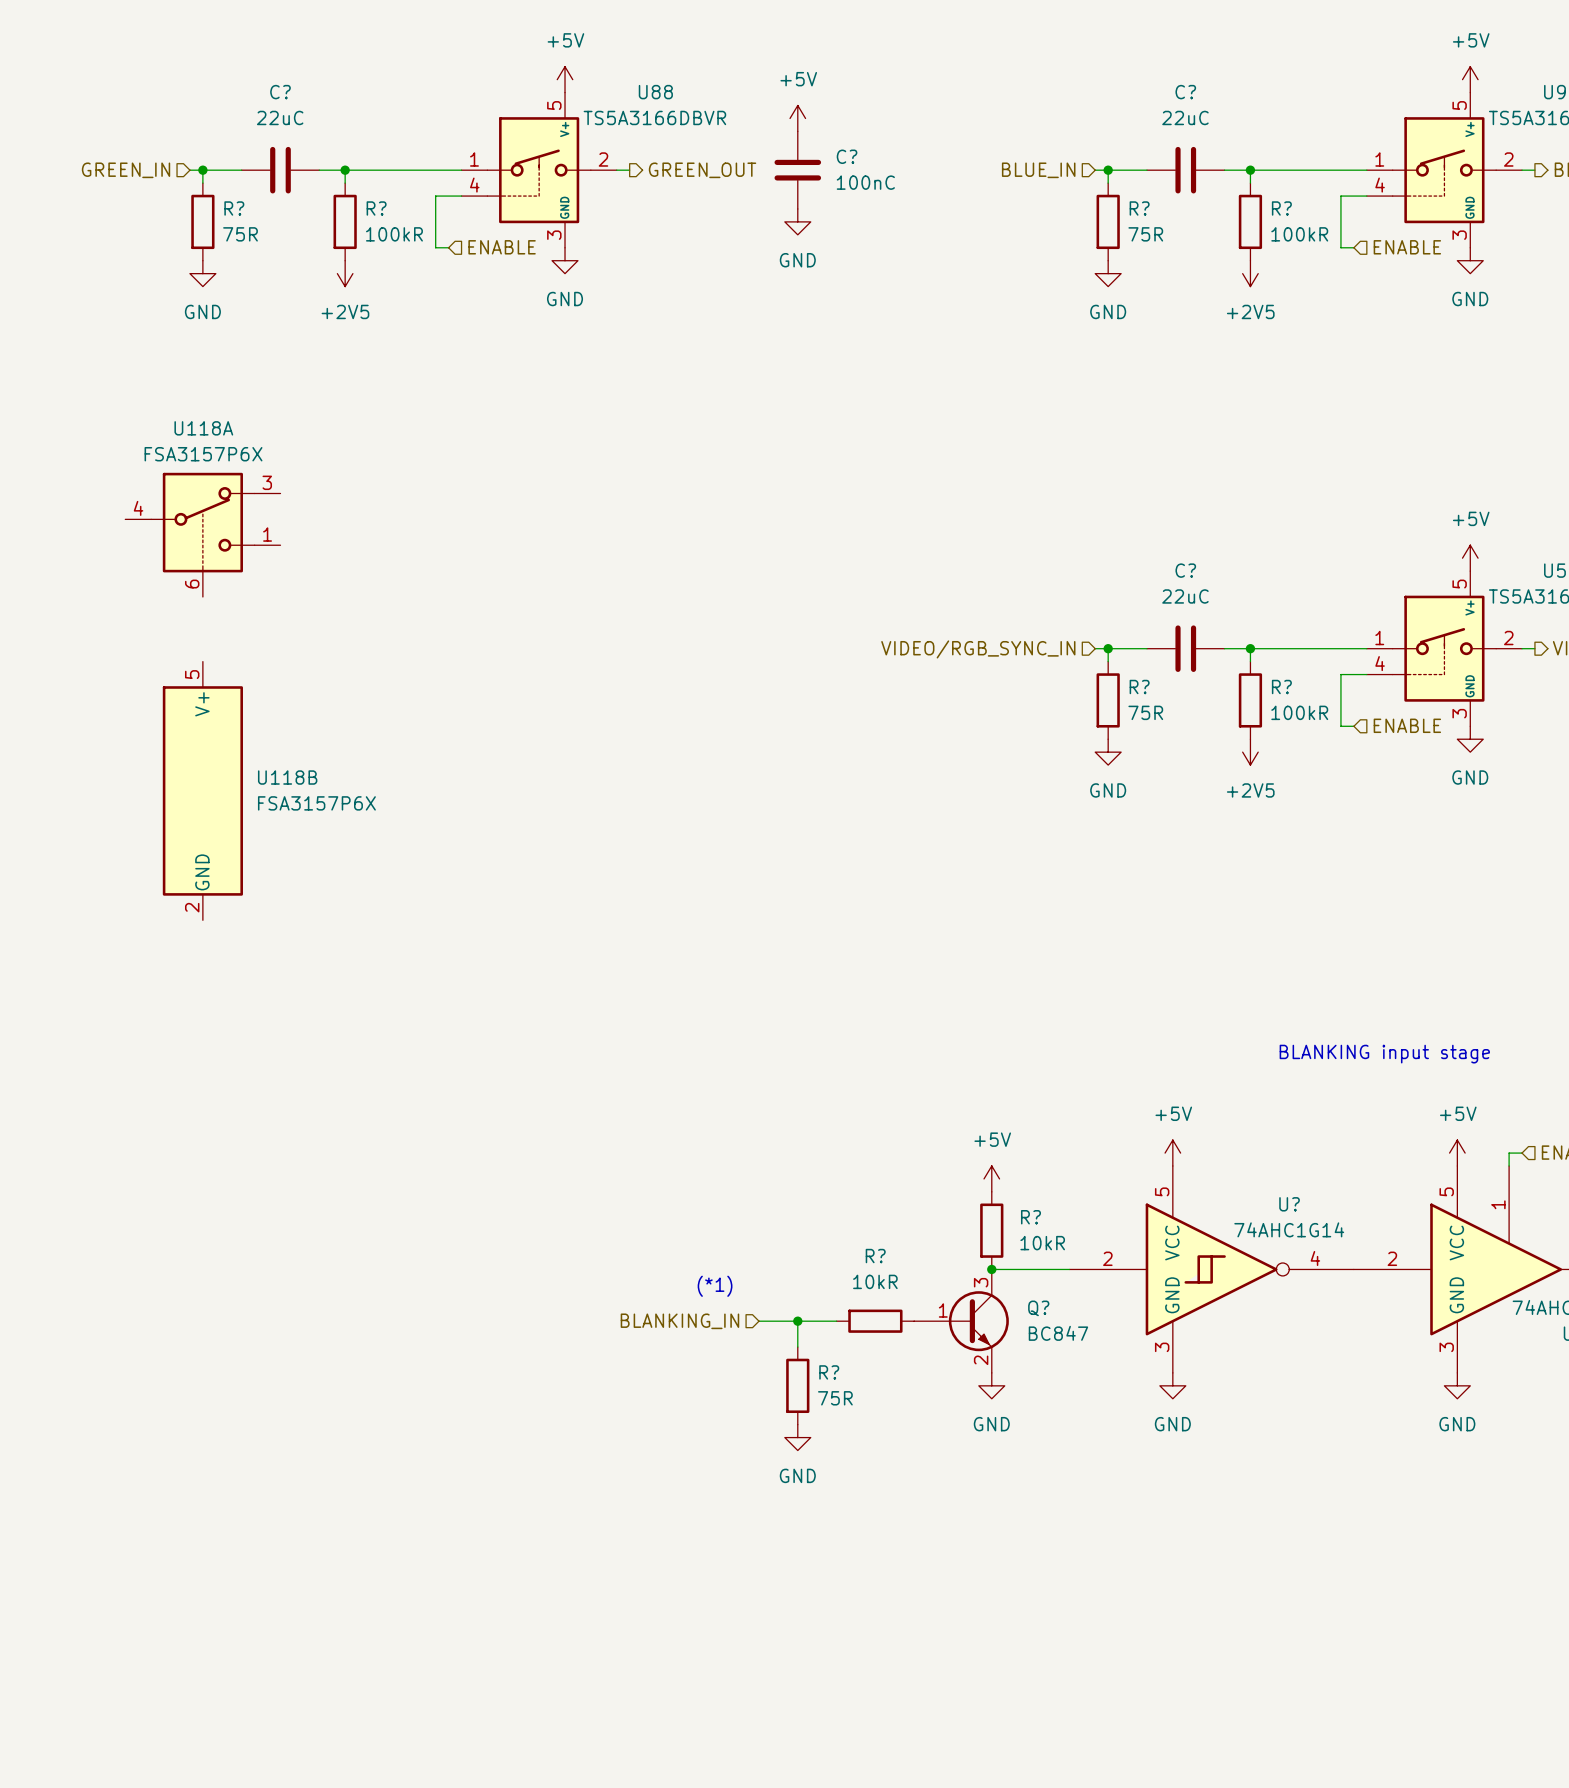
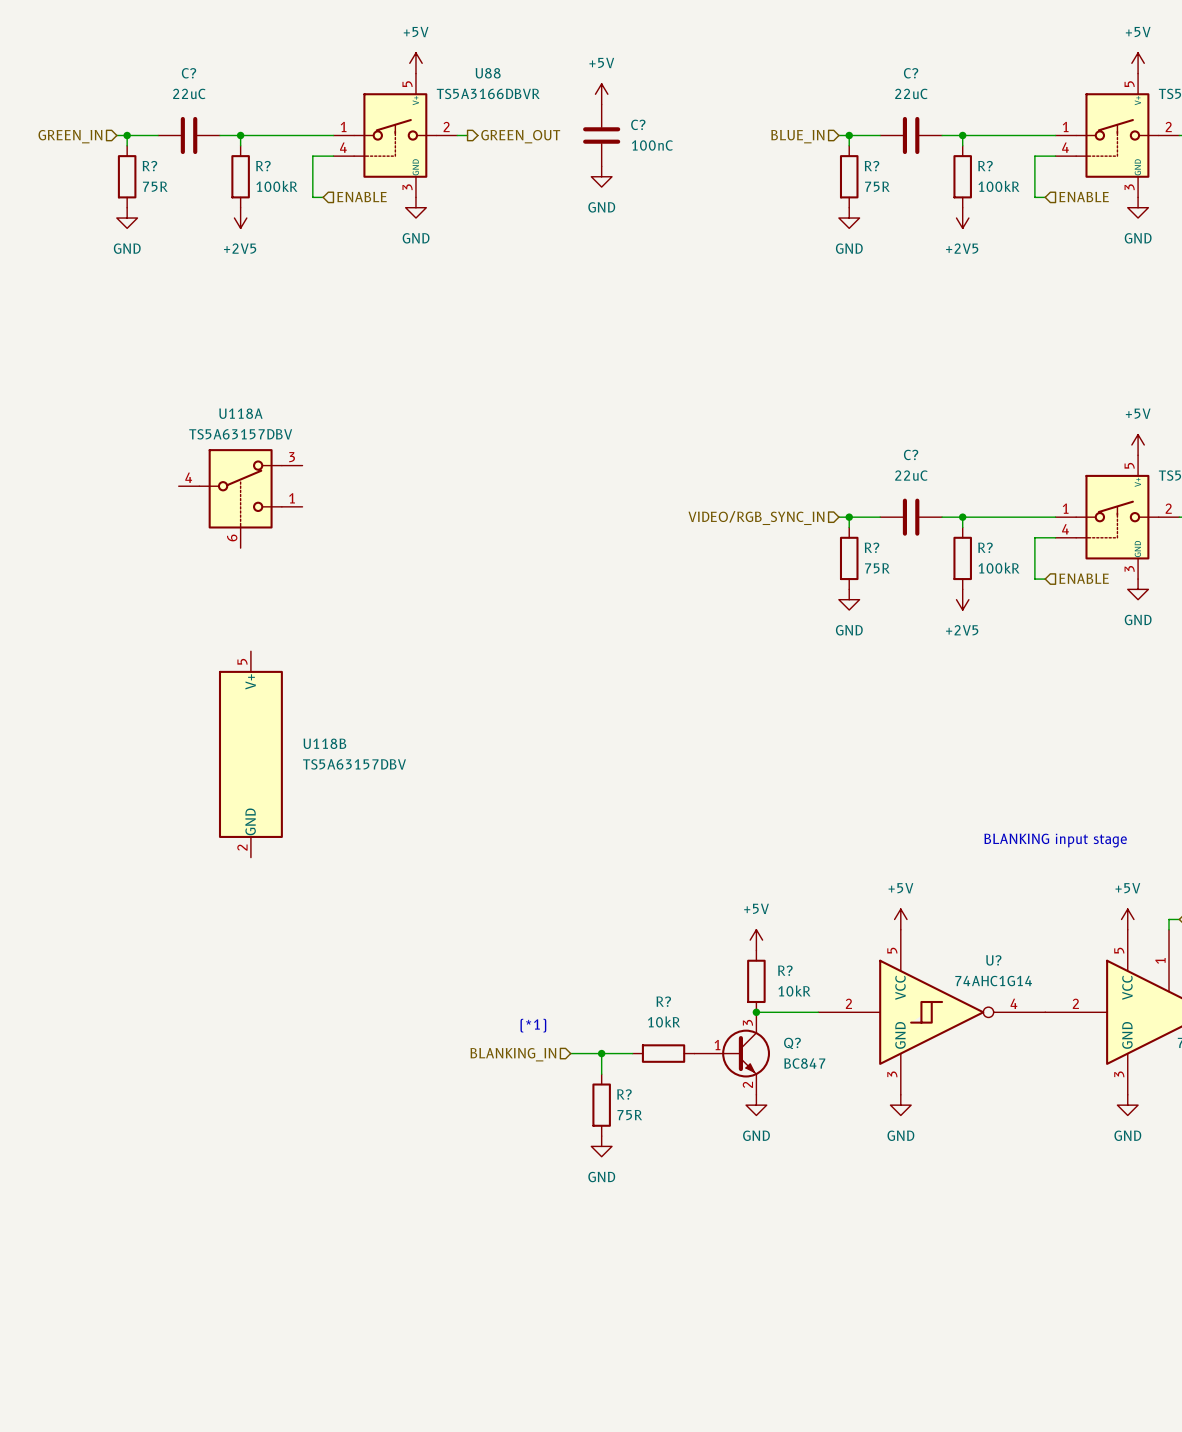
U118A value: FSA3157P6X (203, 454) -> TS5A63157DBV (240, 434)
U118A position: (202, 534) -> (240, 498)
U118B name position: U118B (287, 777) -> U118B (324, 743)
U118B position: (202, 790) -> (250, 754)
U118B value: FSA3157P6X (316, 803) -> TS5A63157DBV (354, 764)

